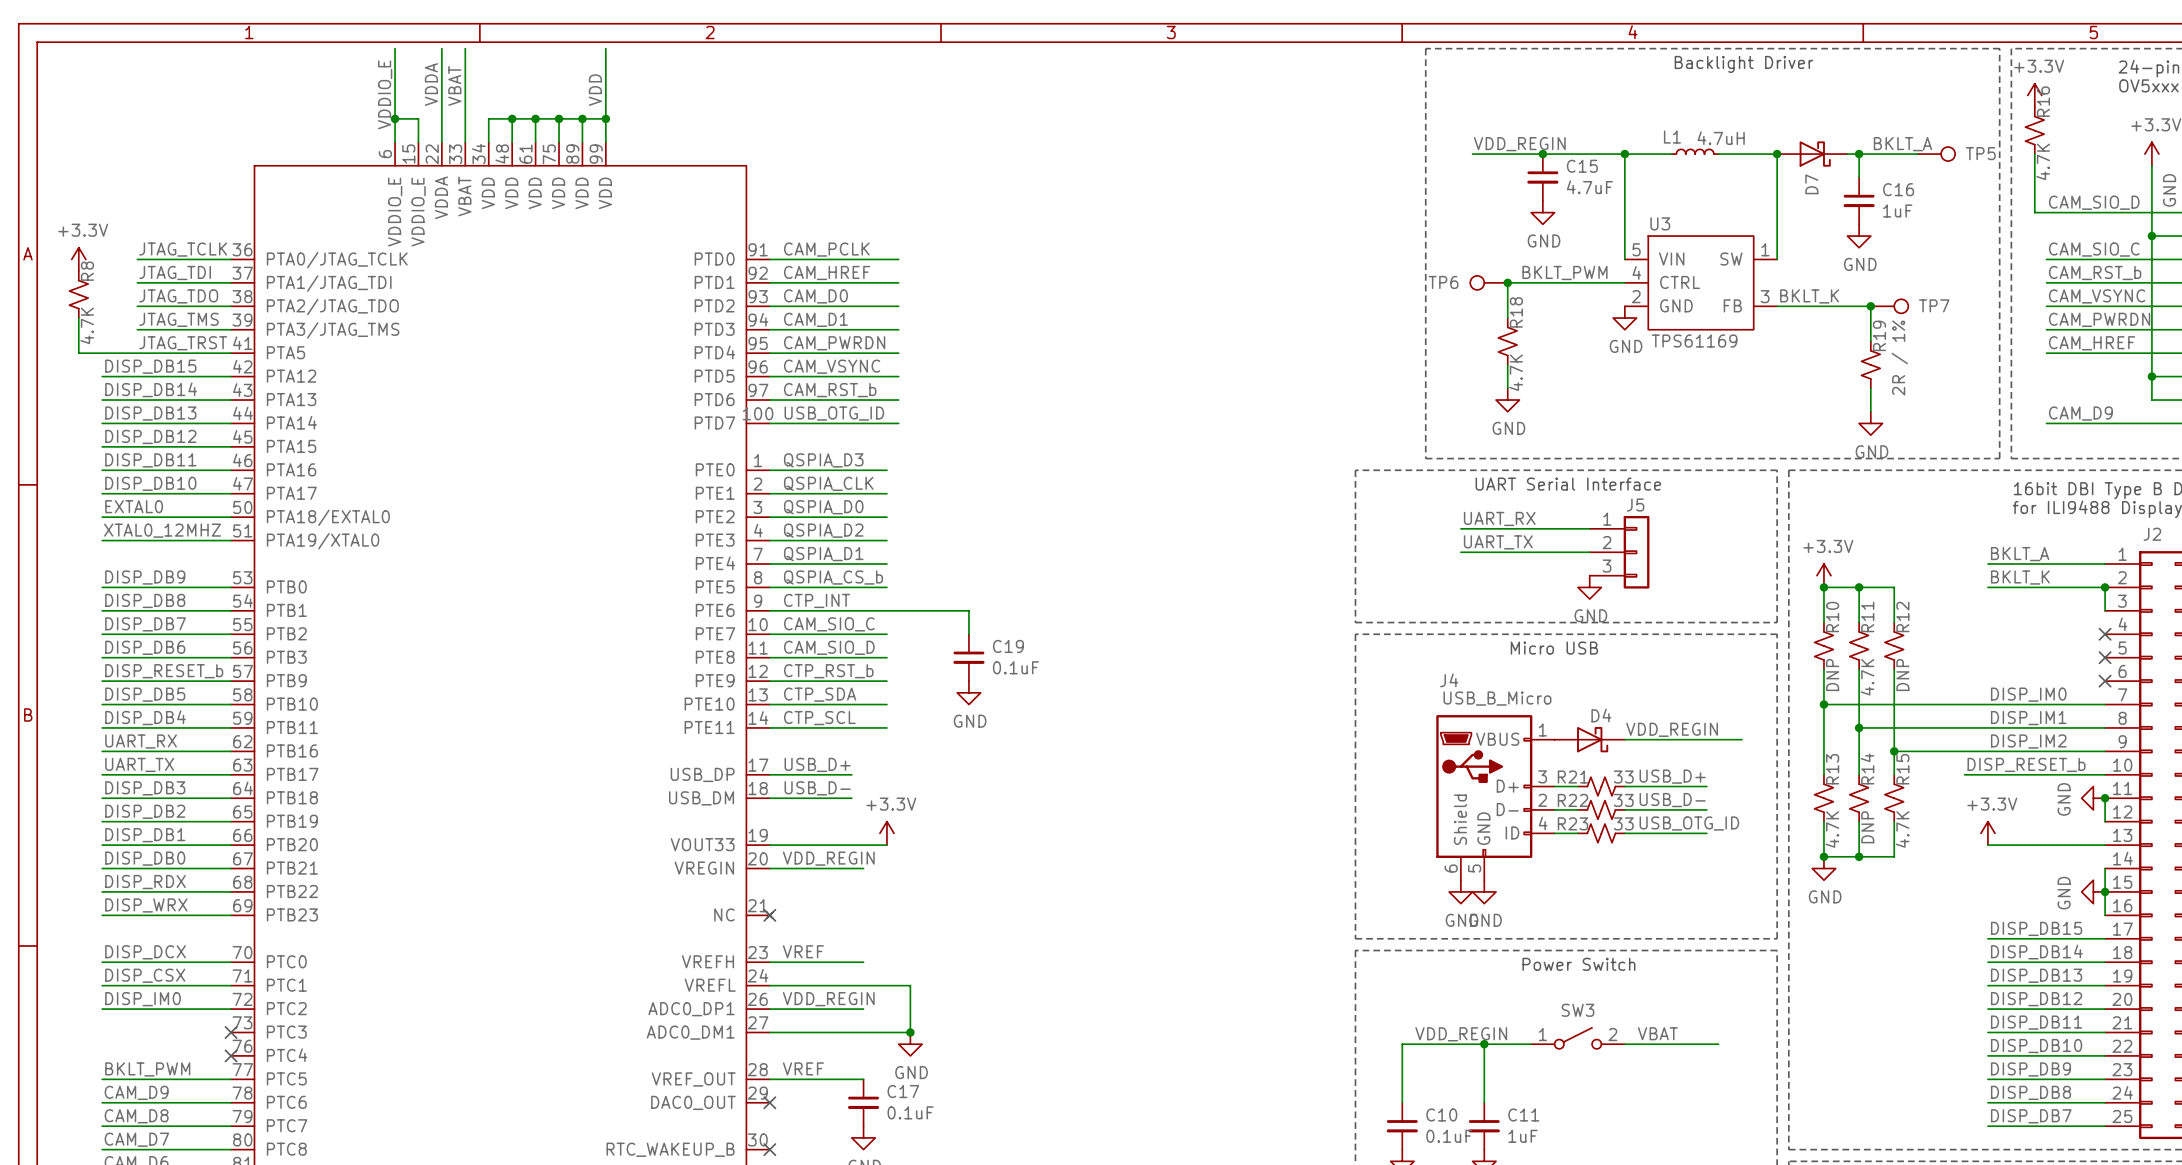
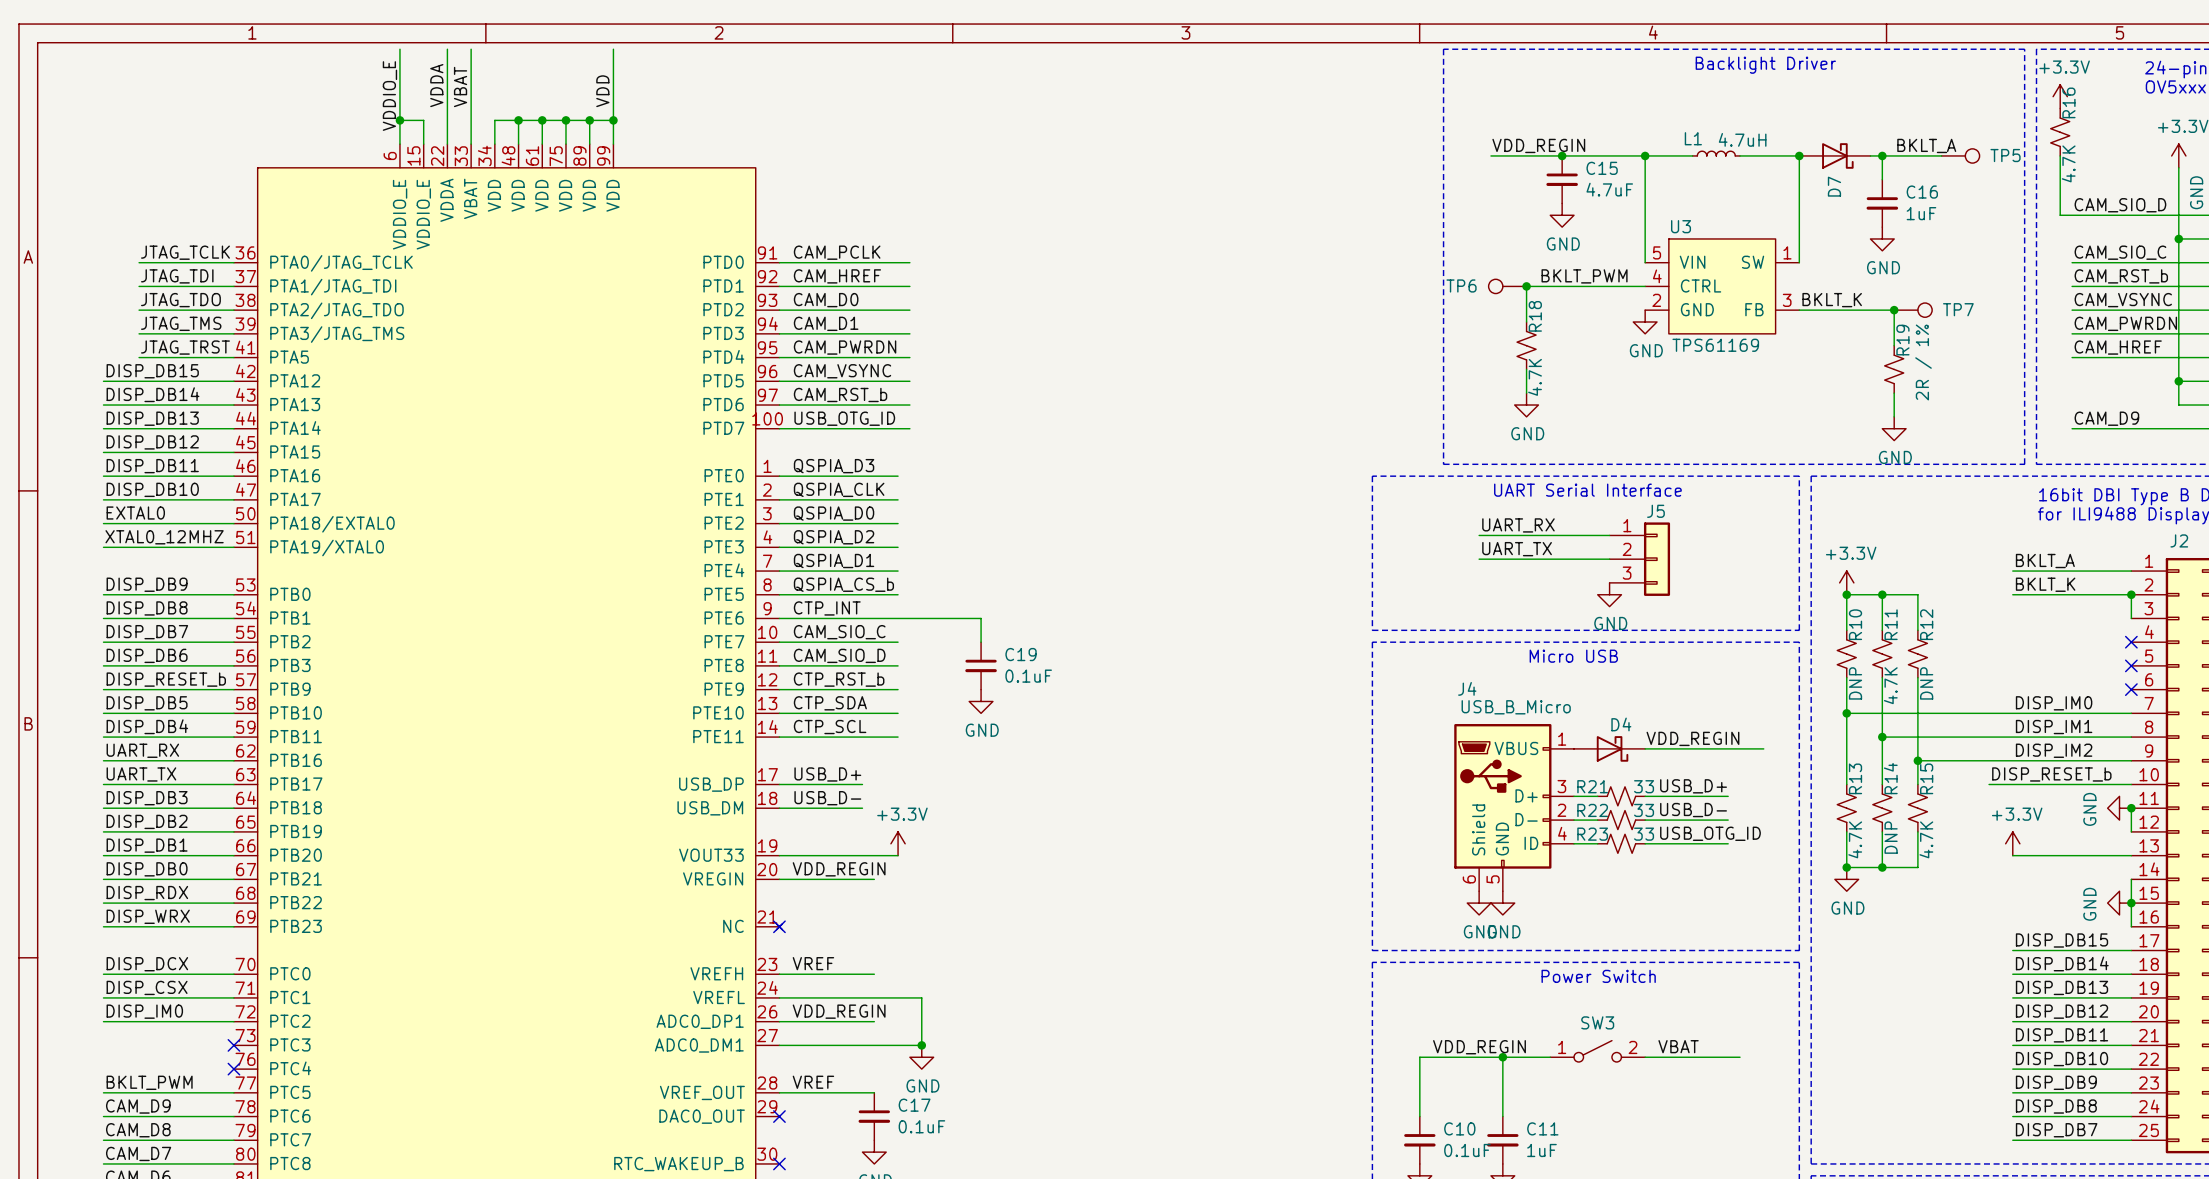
power symbol: +3.3V (78, 259) -> none
R8: 4.7K (78, 294) -> none
wire: (78, 318) (78, 353) (137, 353) -> none

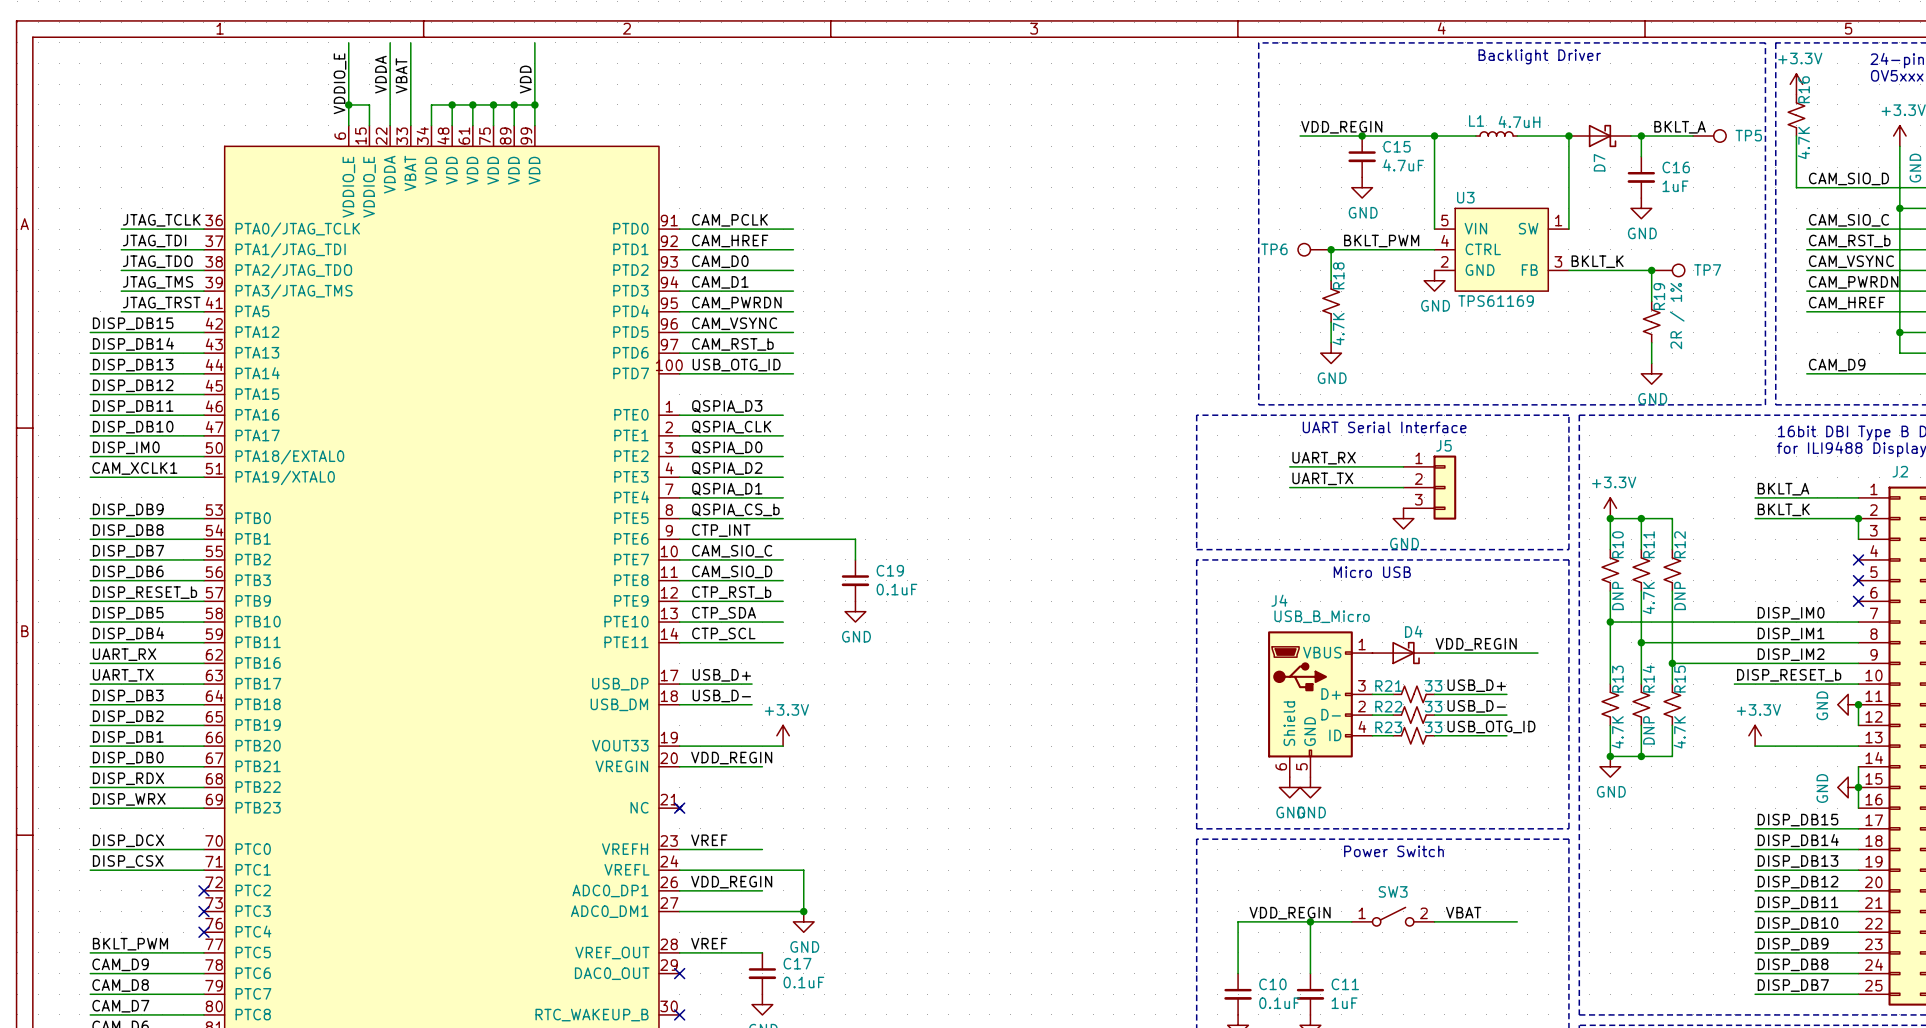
label: EXTAL0 (135, 513) -> DISP_IM0 (126, 447)
label: XTAL0_12MHZ (164, 537) -> CAM_XCLK1 (134, 468)
label: DISP_IM0 (144, 1011) -> none
wire: (103, 1021) (233, 1021) -> none
no-connect mark: none -> (203, 890)

